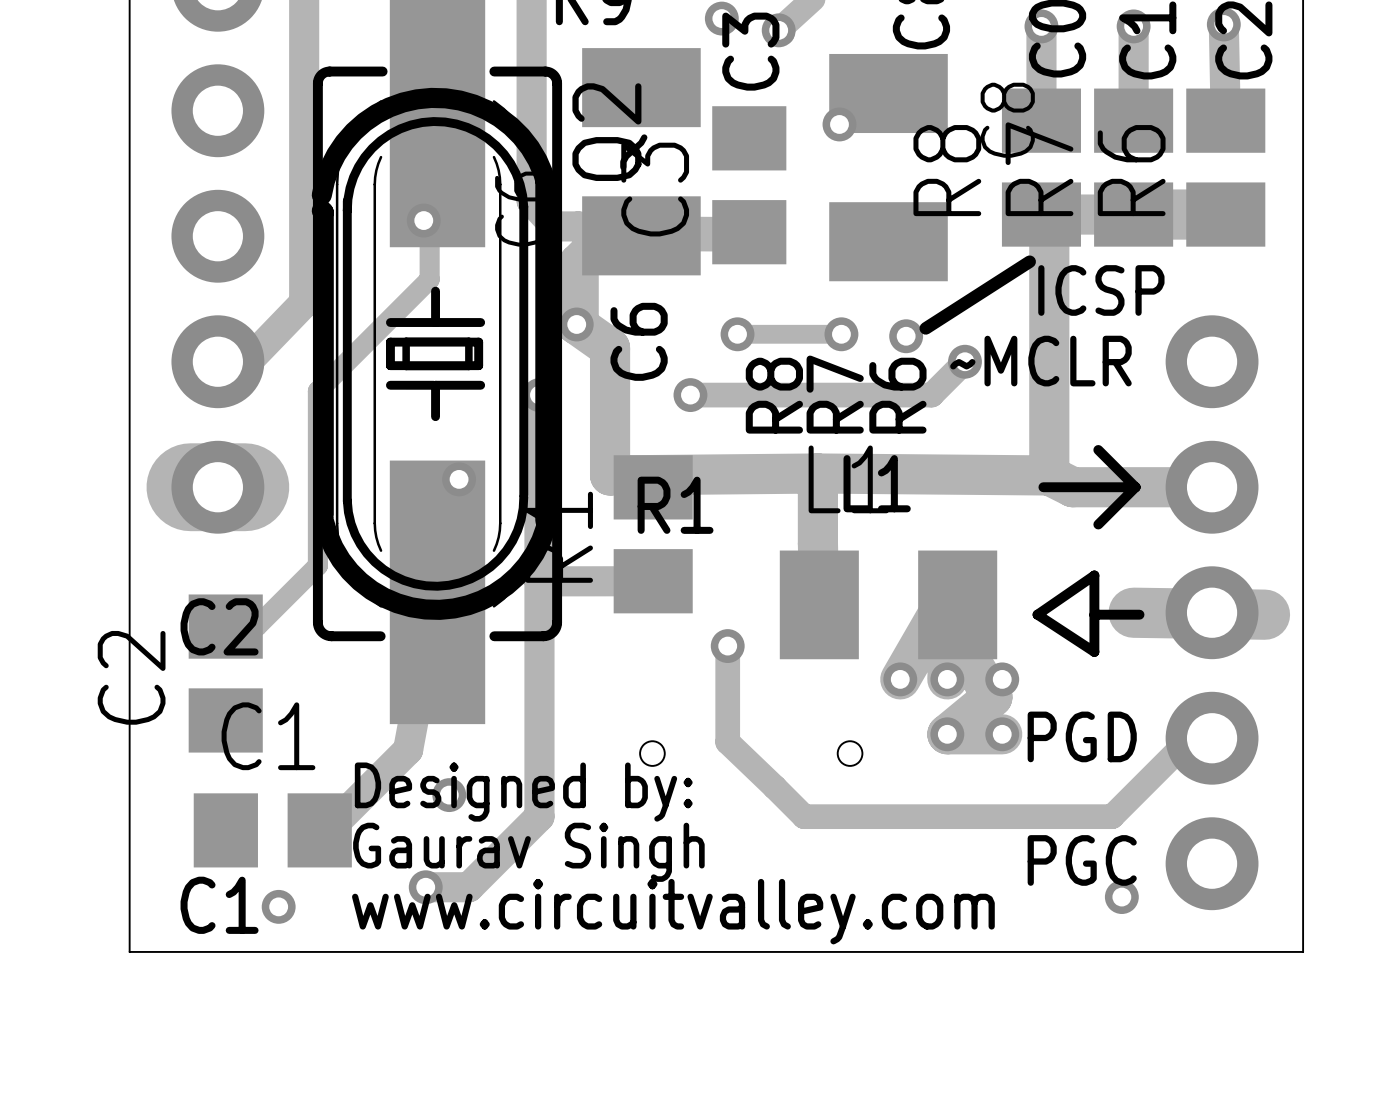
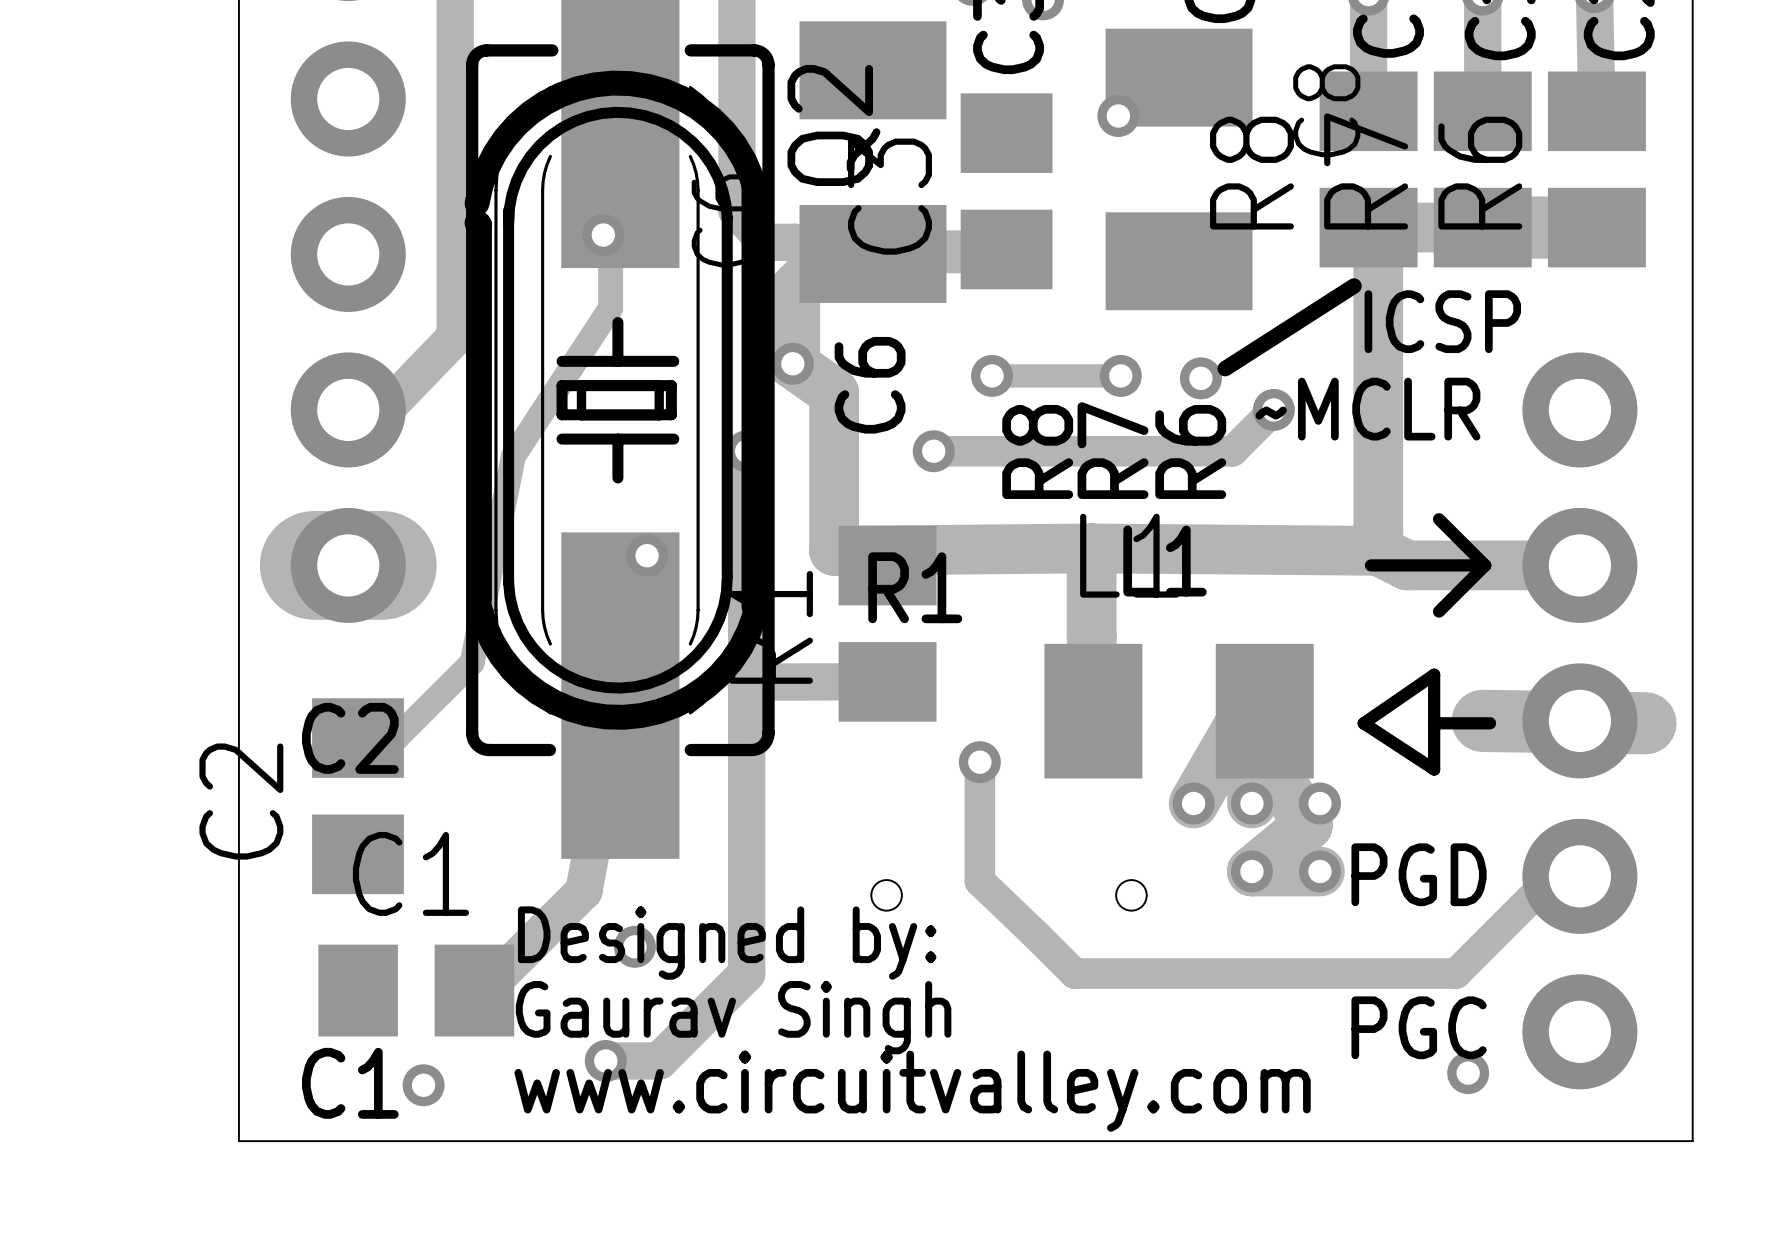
track: (429, 279) (317, 391) (317, 565) -> (610, 307) (513, 456) (472, 662)

